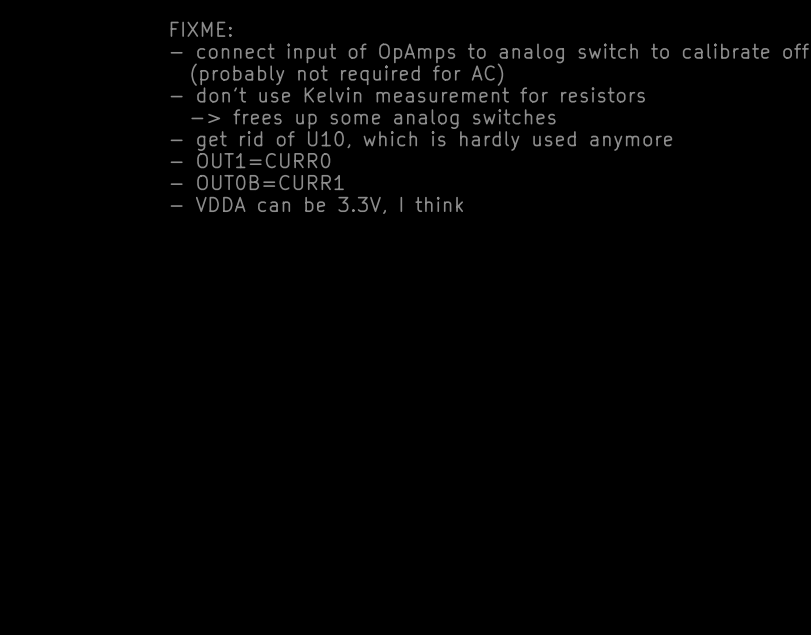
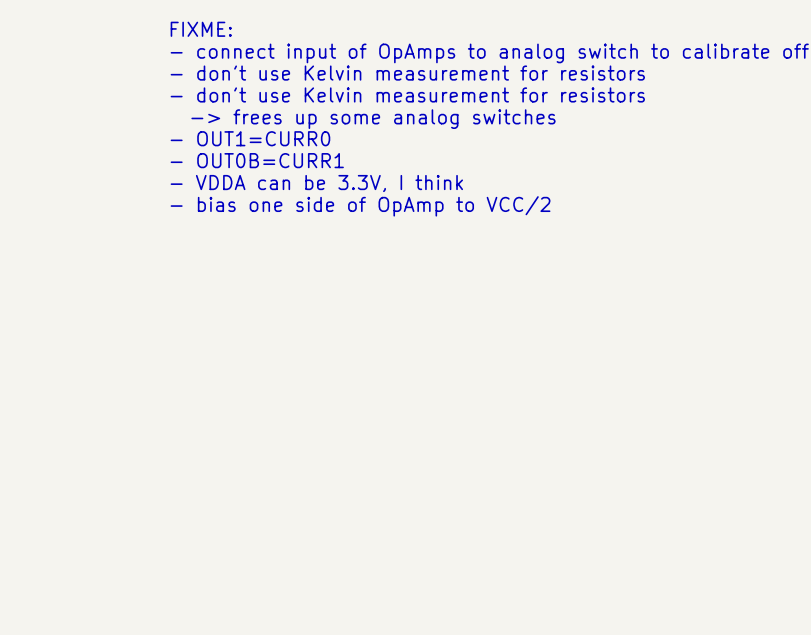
text: (probably not required for AC) (347, 74) -> - don't use Kelvin measurement for resistors (407, 73)
text: - get rid of U10, which is hardly used anymore (421, 141) -> - OUT1=CURR0 (250, 138)
text: - OUT1=CURR0 (250, 160) -> - OUT0B=CURR1 (257, 160)
text: - OUT0B=CURR1 (257, 182) -> - VDDA can be 3.3V, I think (316, 183)
text: - VDDA can be 3.3V, I think (316, 205) -> - bias one side of OpAmp to VCC/2 (360, 206)

